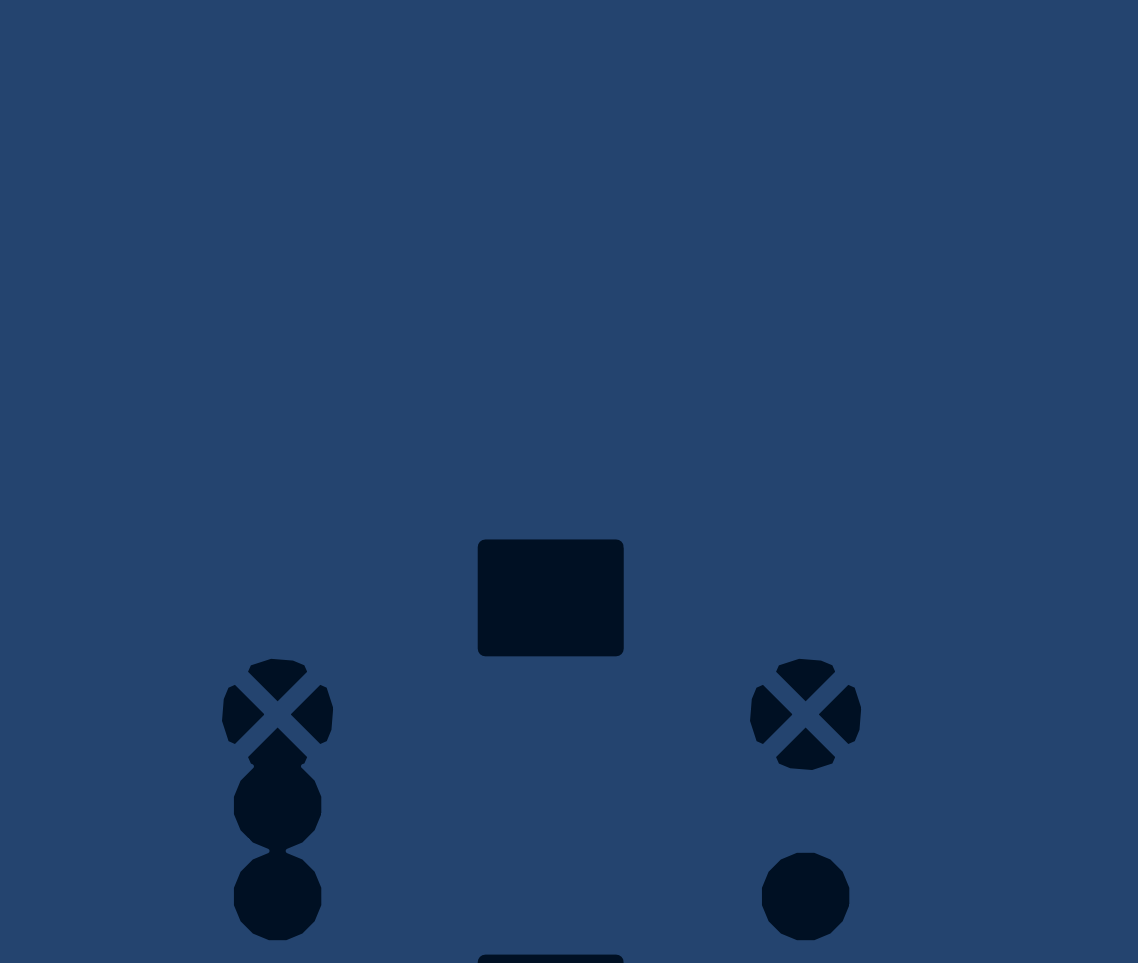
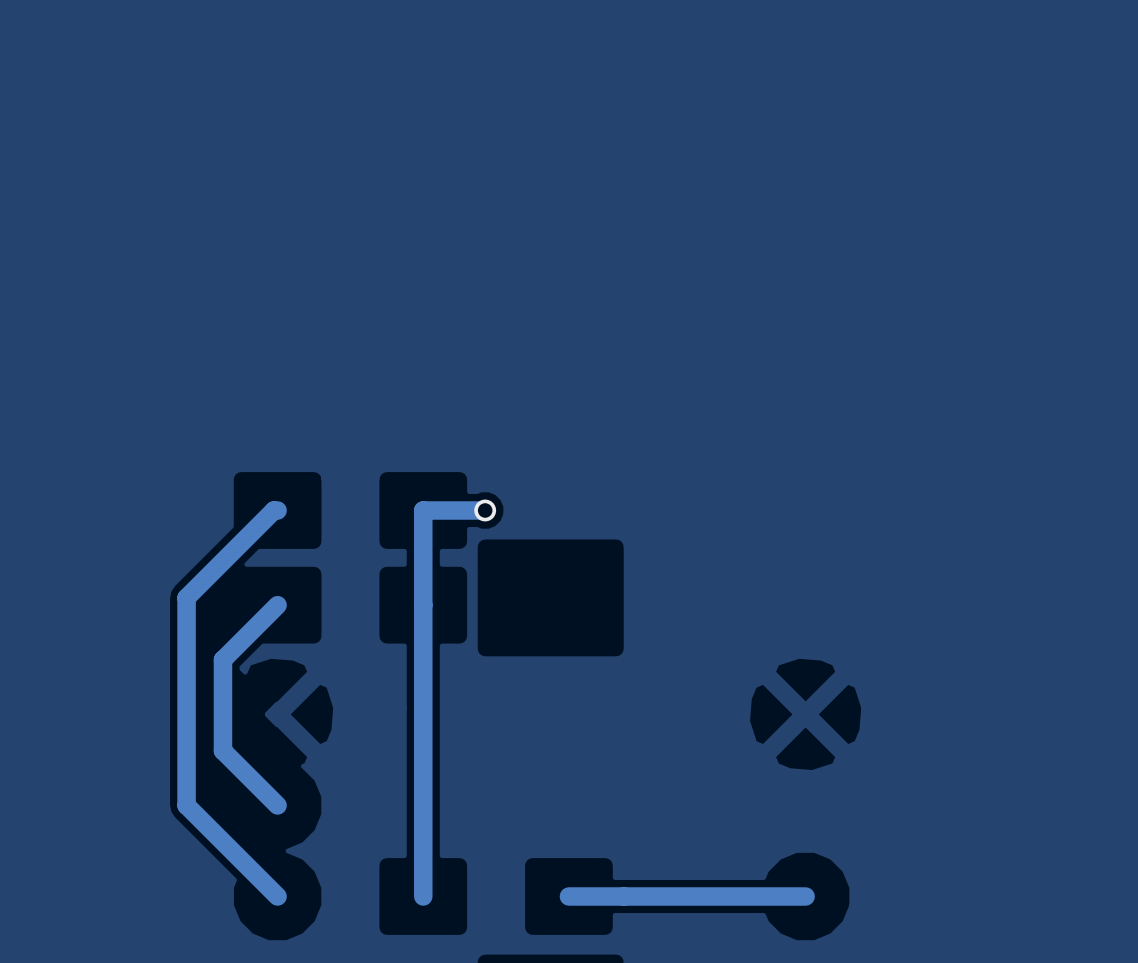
track: none -> (277, 510) (273, 510) (186, 597) (186, 805) (277, 896)
track: none -> (485, 510) (423, 510) (423, 896)
via: none -> (485, 510)
track: none -> (277, 605) (222, 659) (222, 750) (277, 805)
track: none -> (805, 896) (568, 896)

